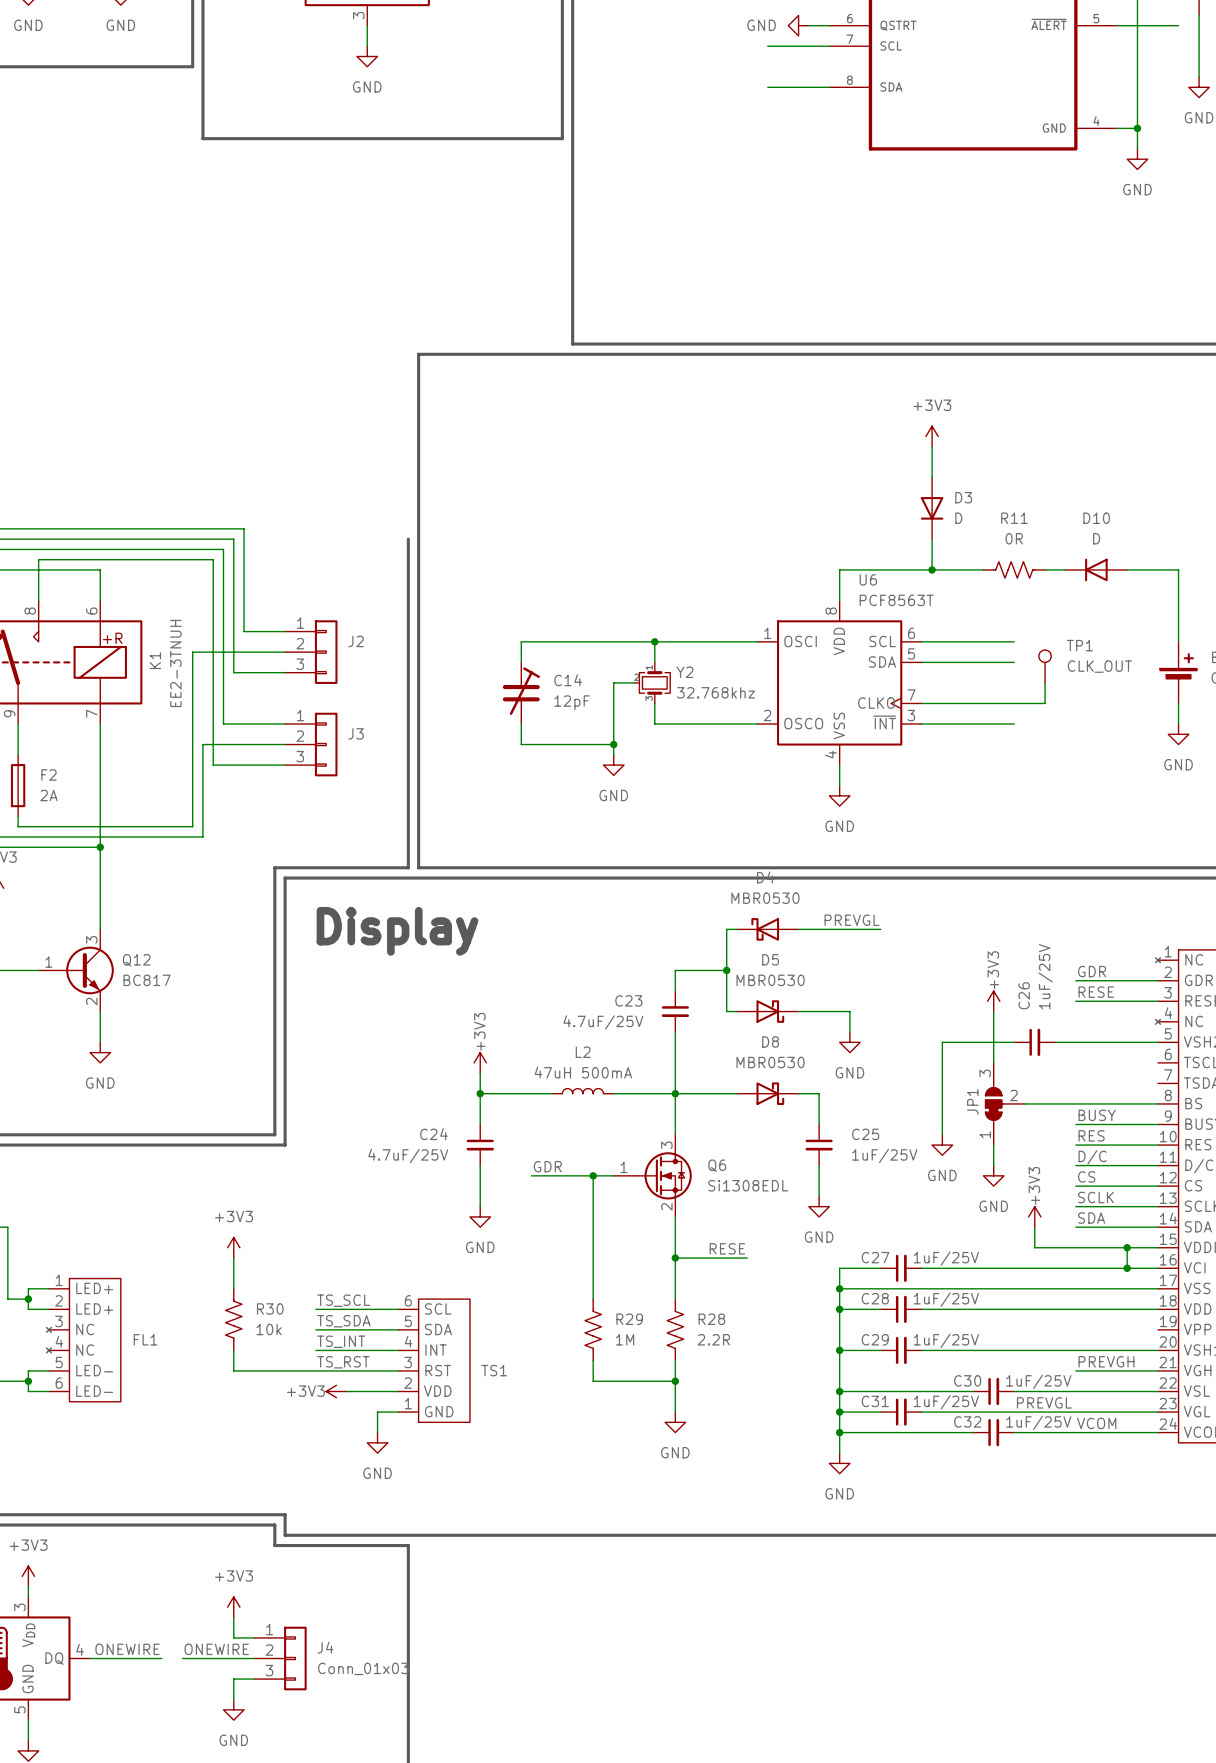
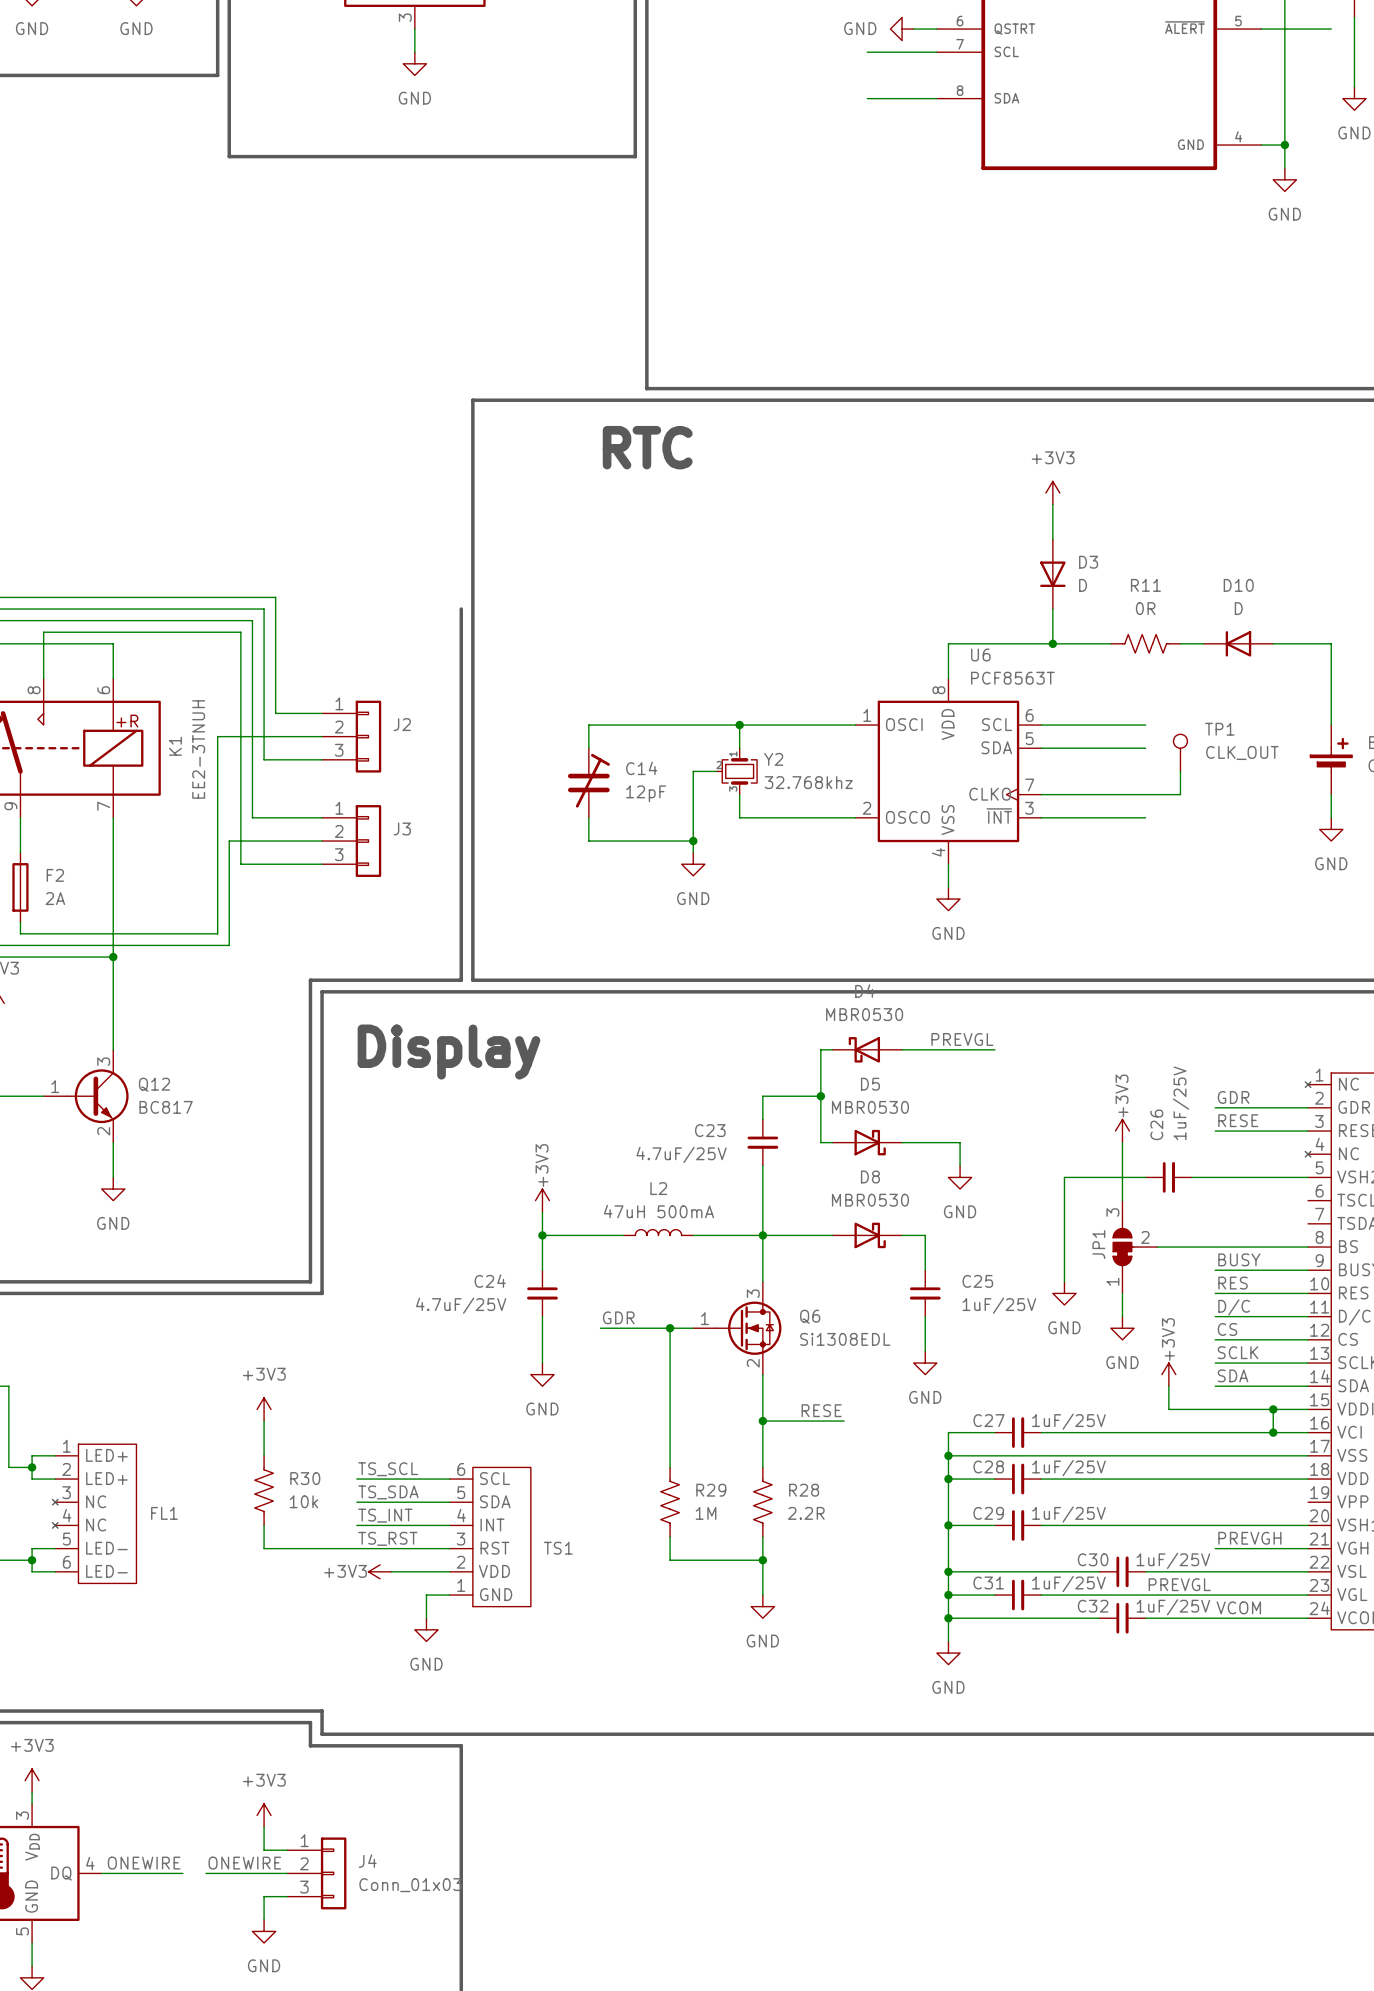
text: none -> RTC (647, 447)

